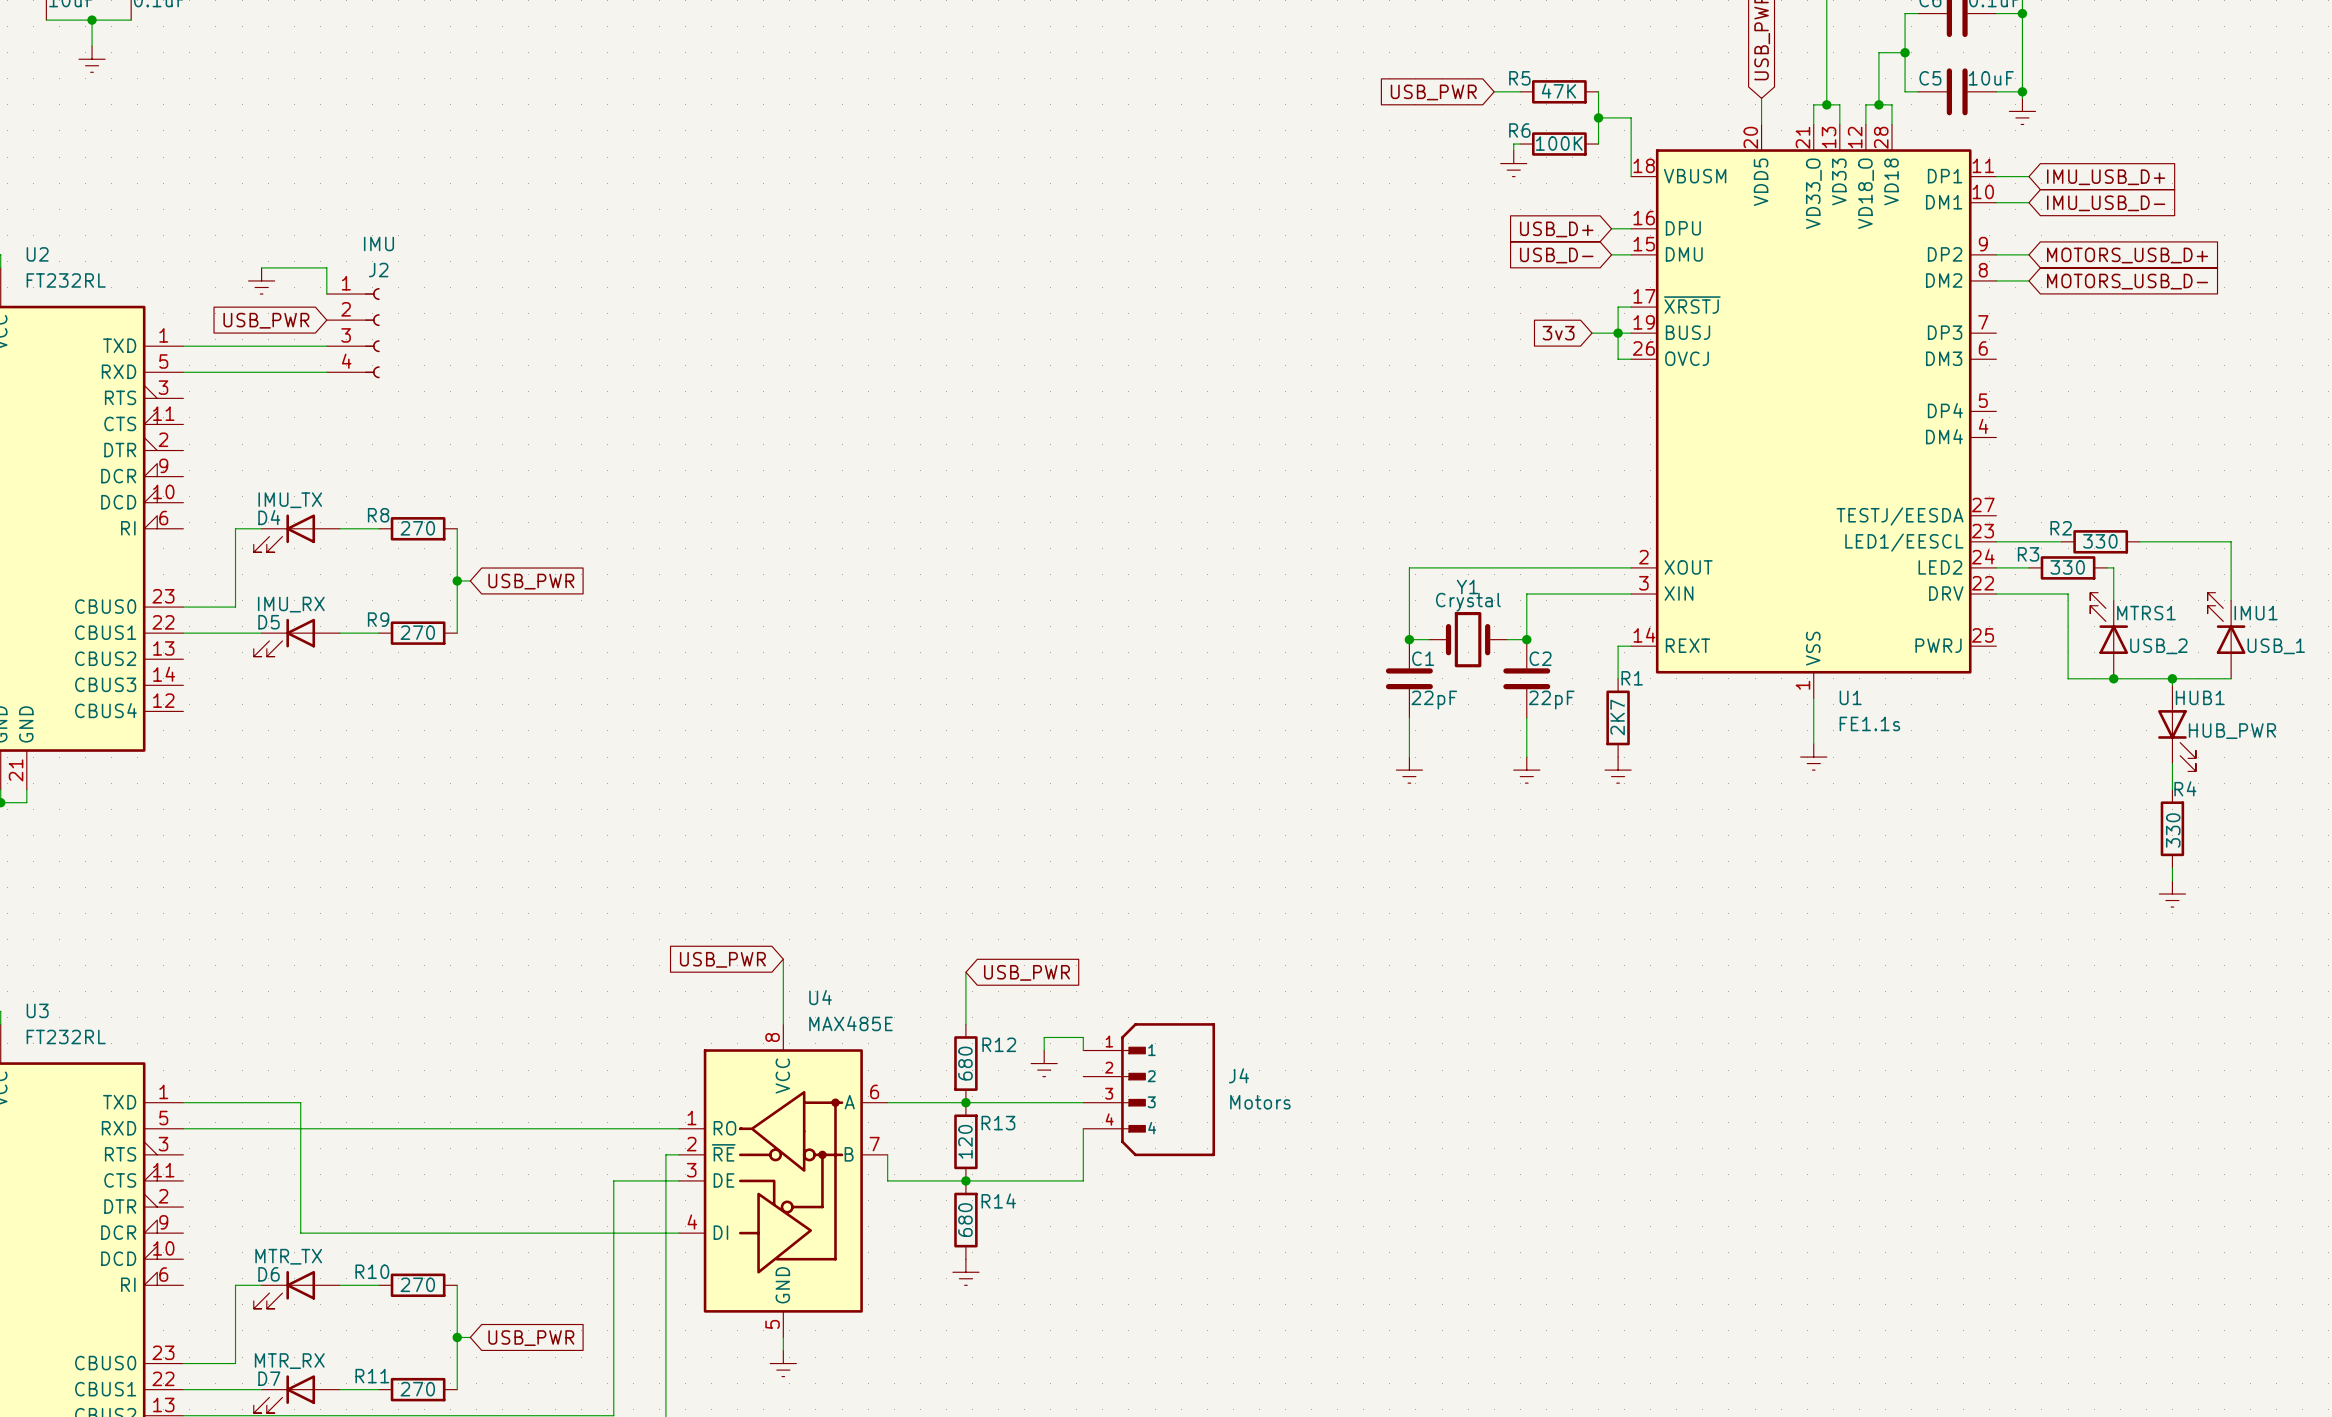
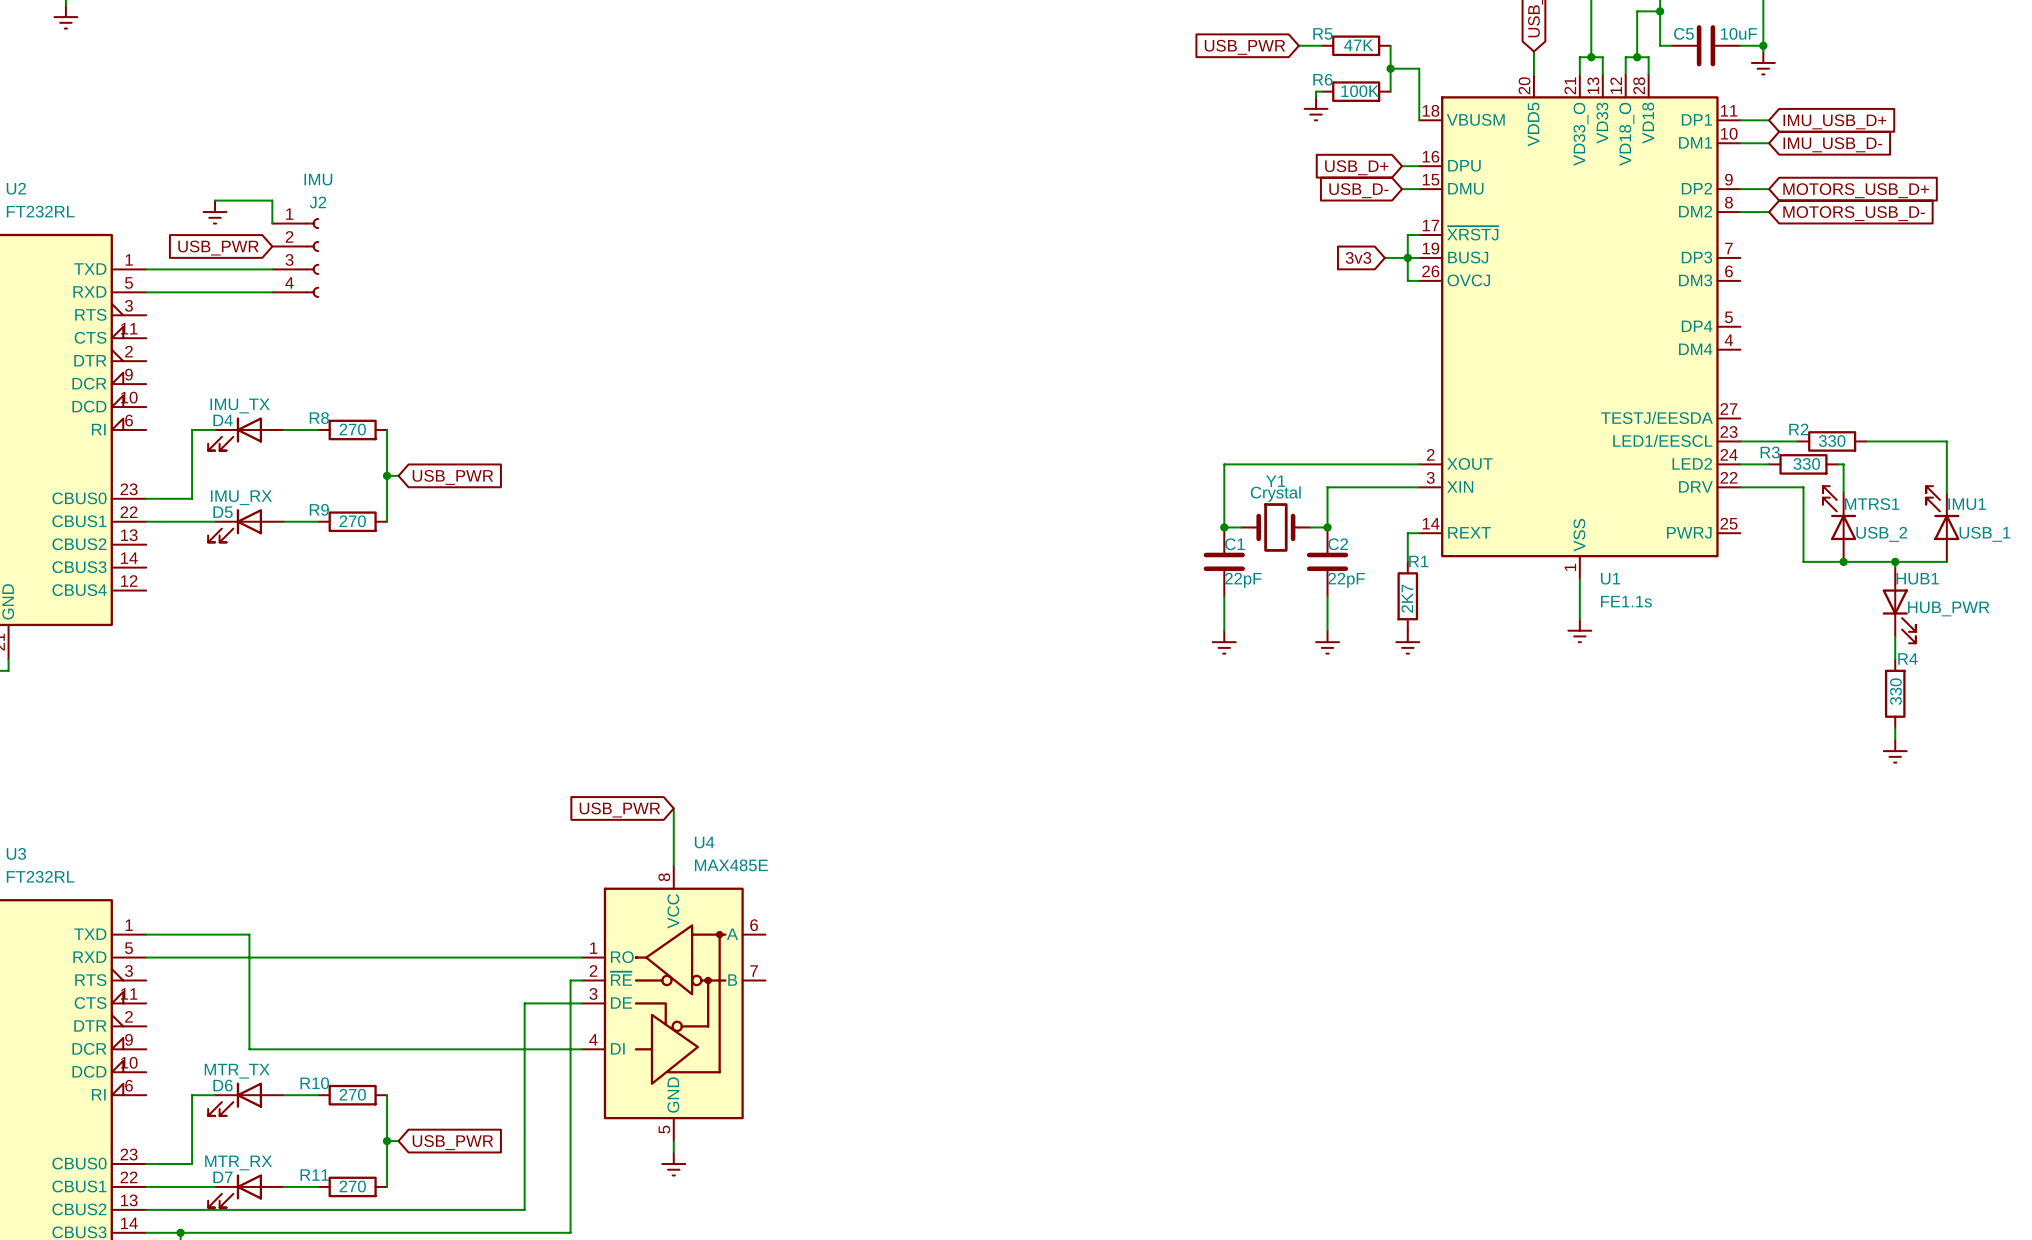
wire: (965, 972) (965, 1024) -> none
global label: USB_PWR (1026, 972) -> none
wire: (1044, 1050) (1044, 1037) (1083, 1037) (1083, 1050) -> none
R12: 680 (965, 1063) -> none
power symbol: (1044, 1063) -> none
J4: Motors (1149, 1089) -> none
wire: (887, 1102) (1083, 1102) -> none
junction: (965, 1102) -> none
wire: (1083, 1128) (1083, 1180) (887, 1180) (887, 1154) -> none
R13: 120 (965, 1141) -> none
junction: (965, 1180) -> none
R14: 680 (965, 1220) -> none
power symbol: (965, 1272) -> none

